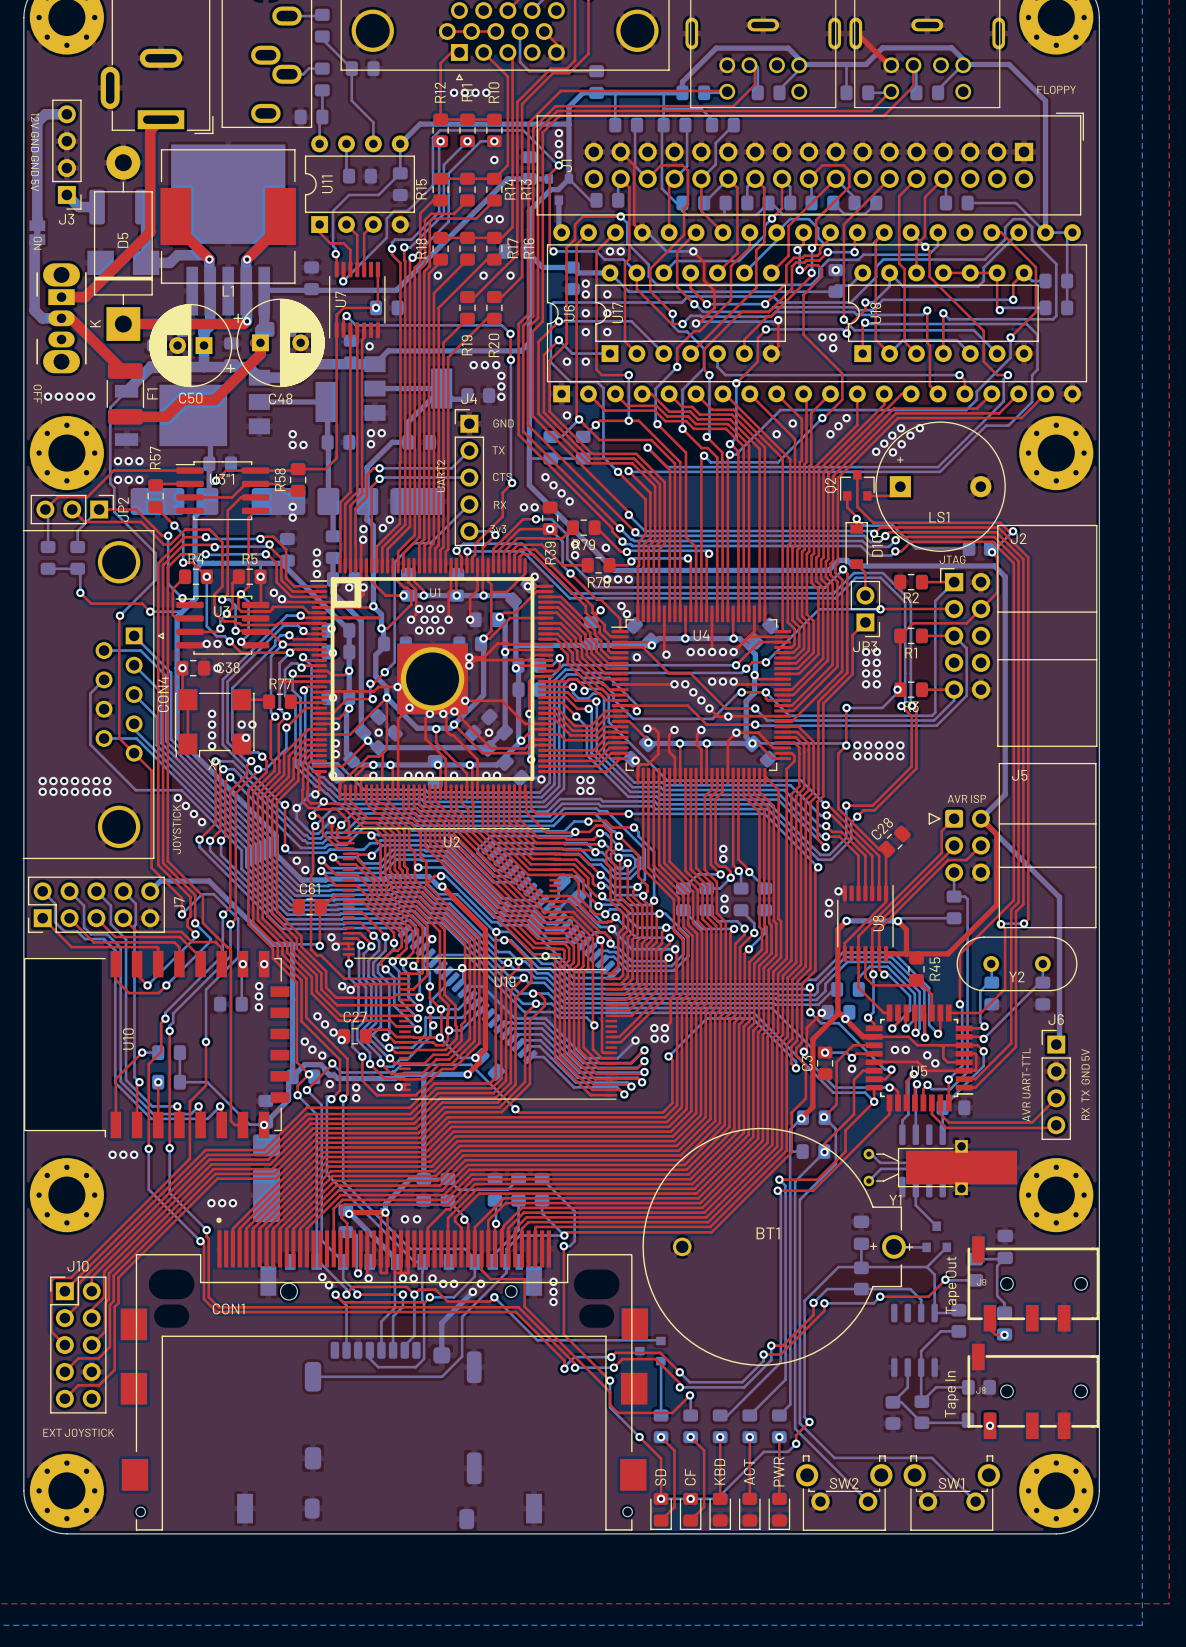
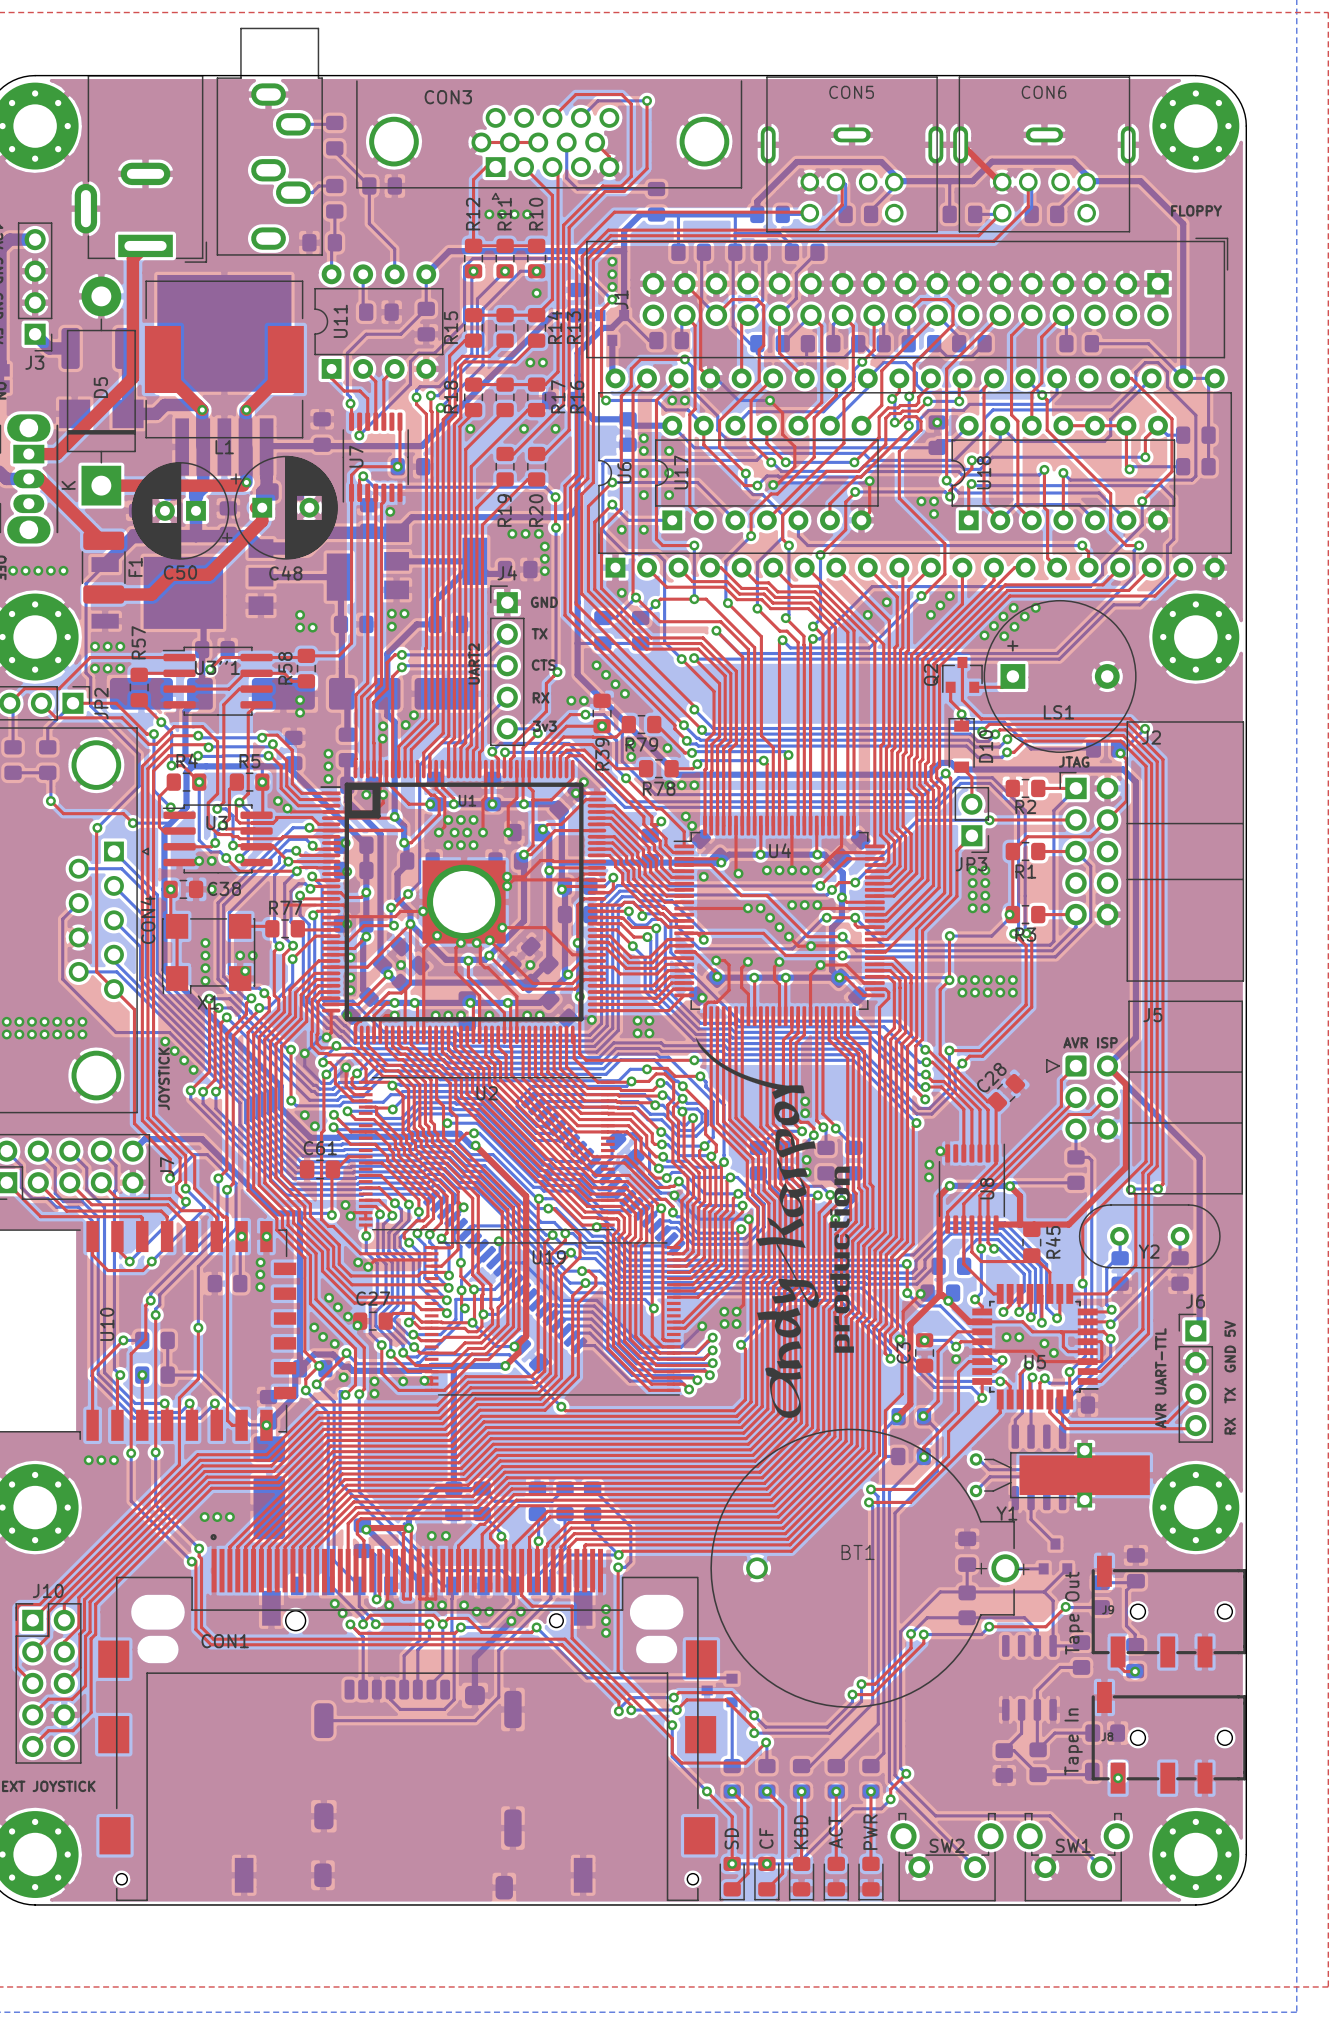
drawing: none -> [695, 1037, 854, 1418]

